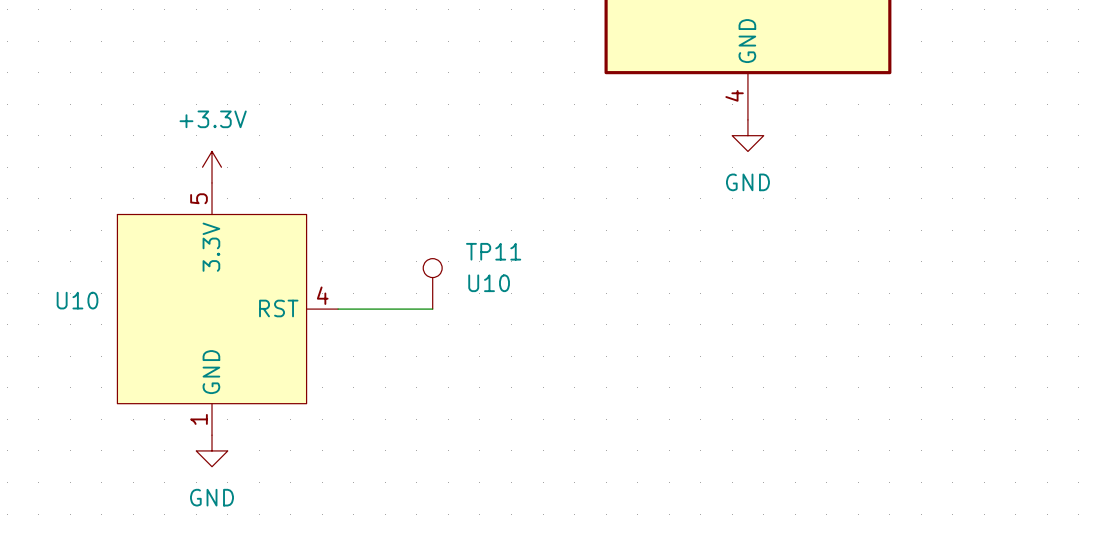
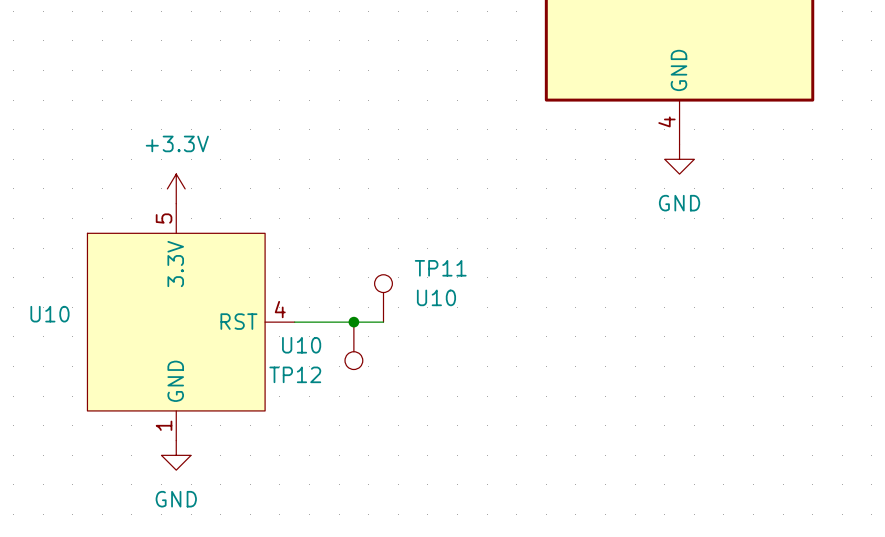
junction: none -> (353, 322)
TP12: none -> U10 (353, 345)

